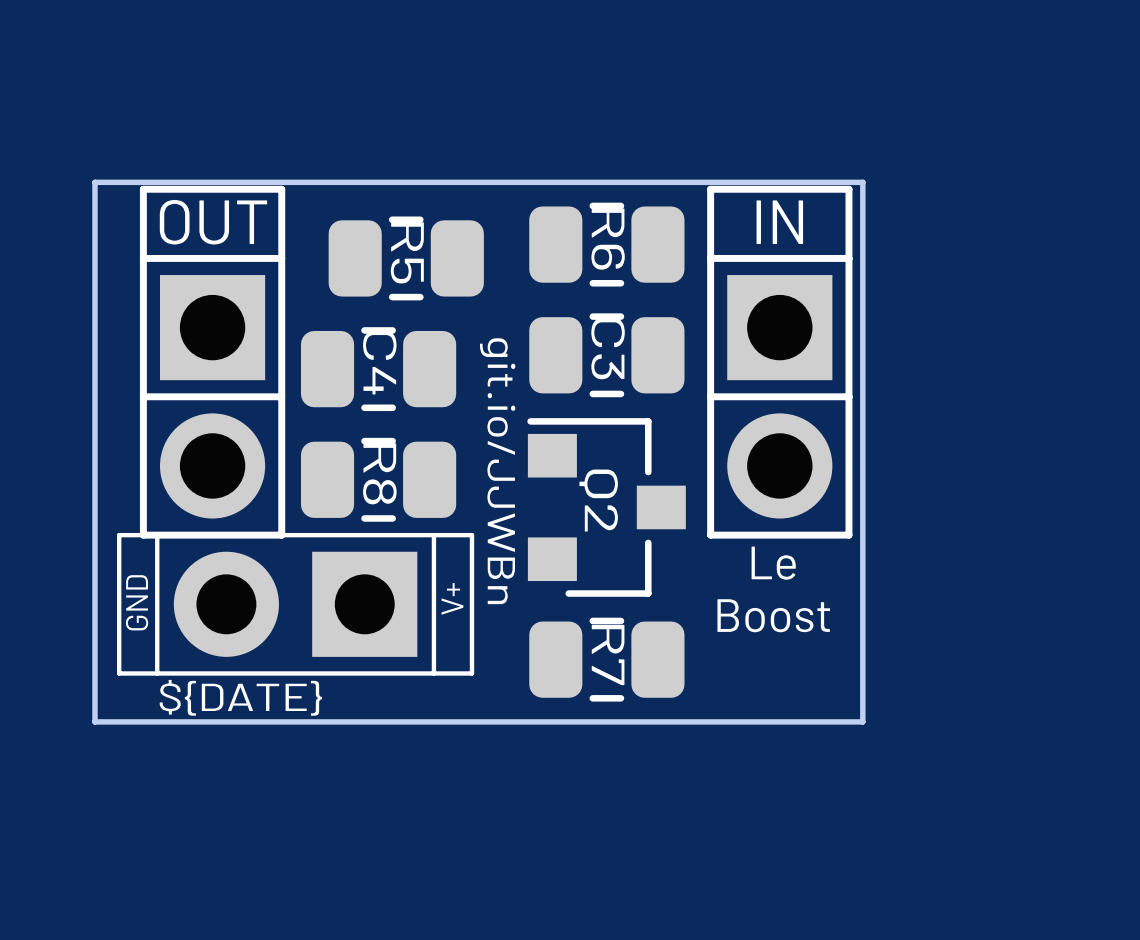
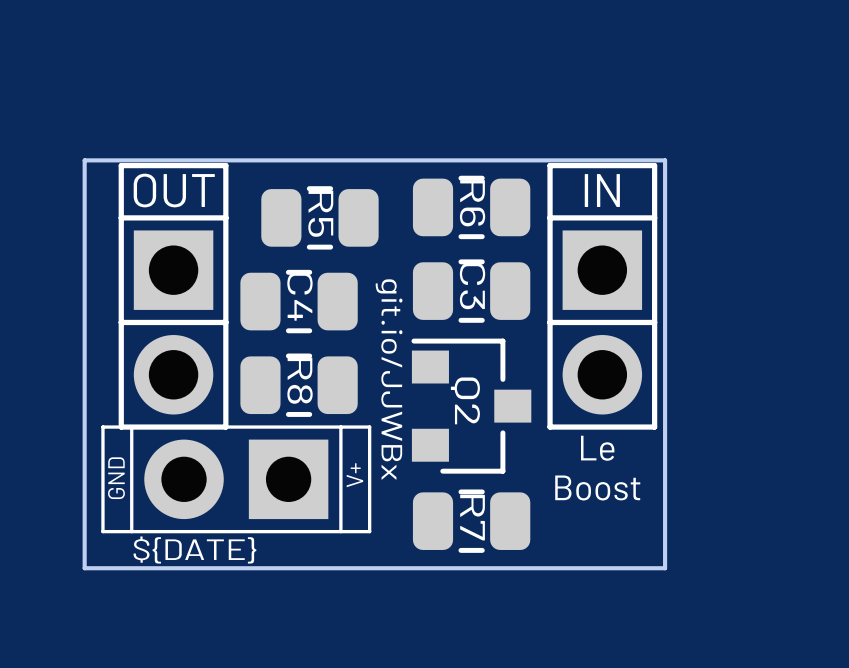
text: git.io/JJWBn (497, 471) -> git.io/JJWBx (389, 379)

